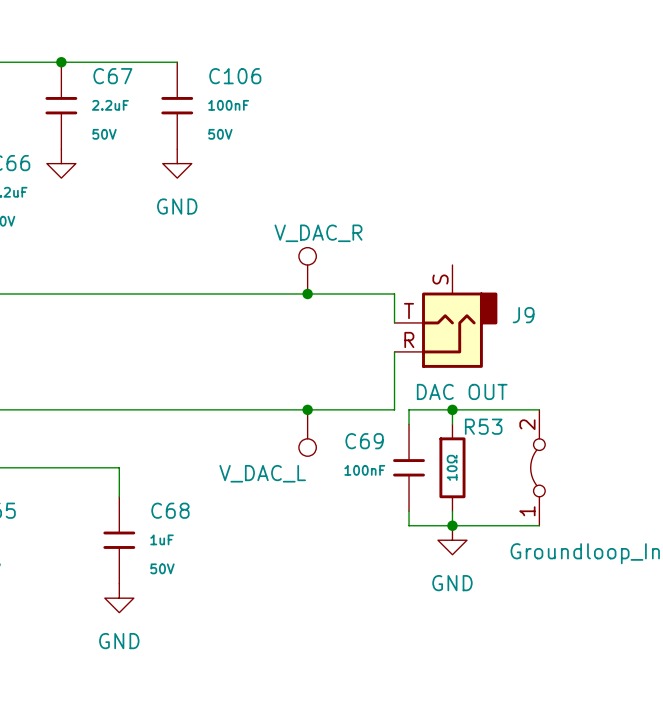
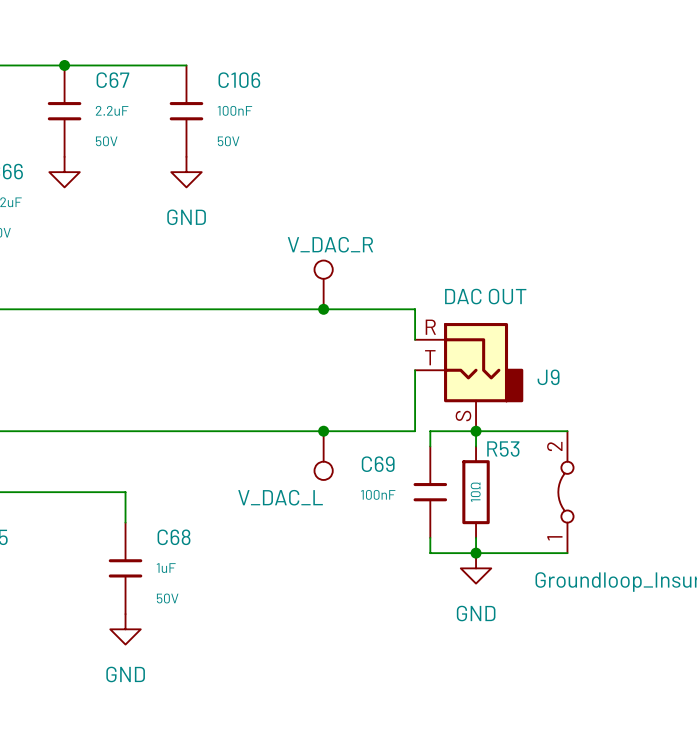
J9 flip: as is (459, 330) -> up-down (483, 362)

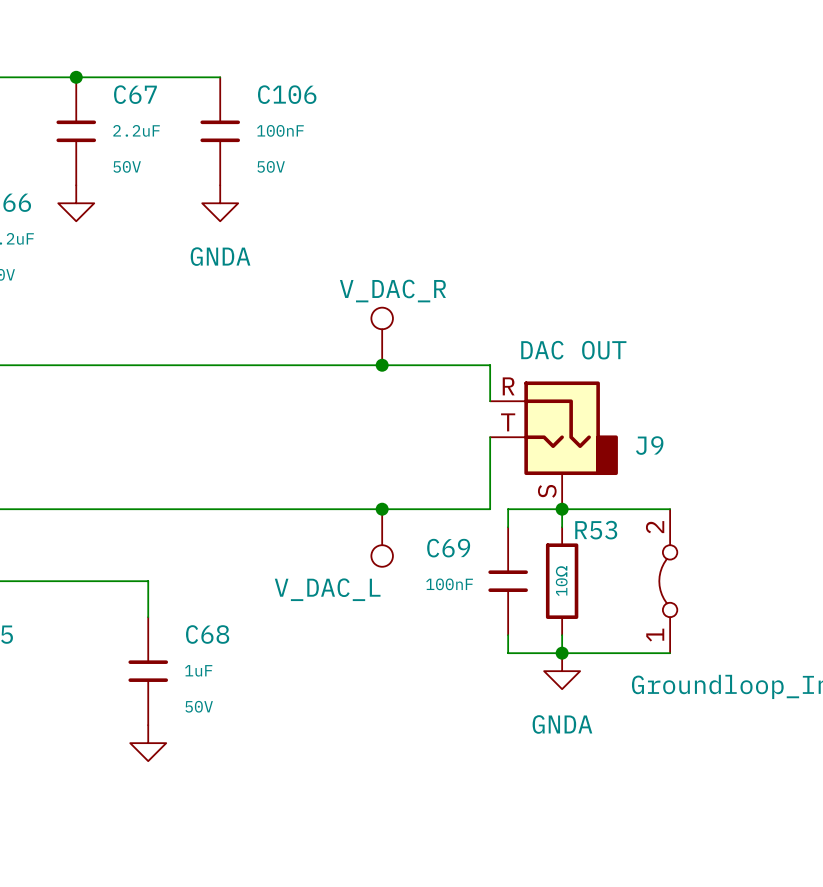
power symbol: GND (186, 172) -> GNDA (220, 203)
power symbol: GND (476, 568) -> GNDA (562, 671)
power symbol text: GND (125, 674) -> none

